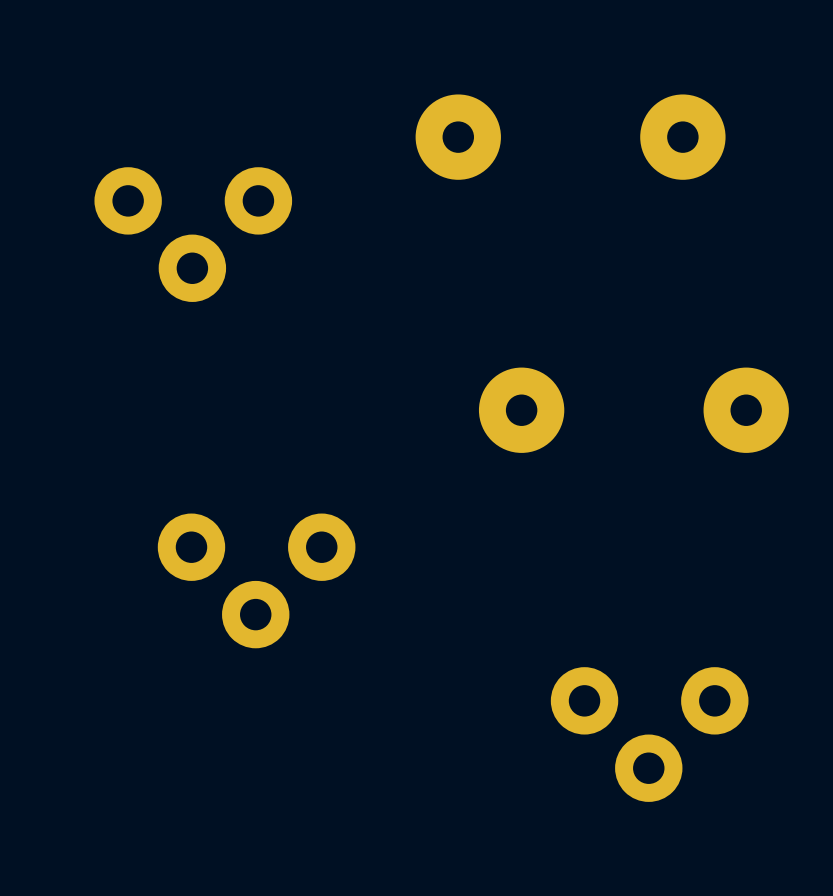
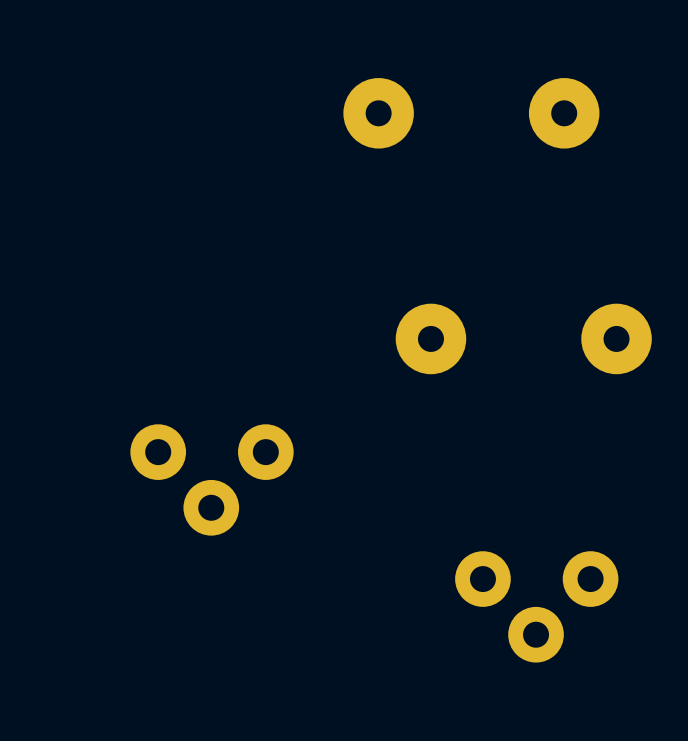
part: (193, 234) -> none

